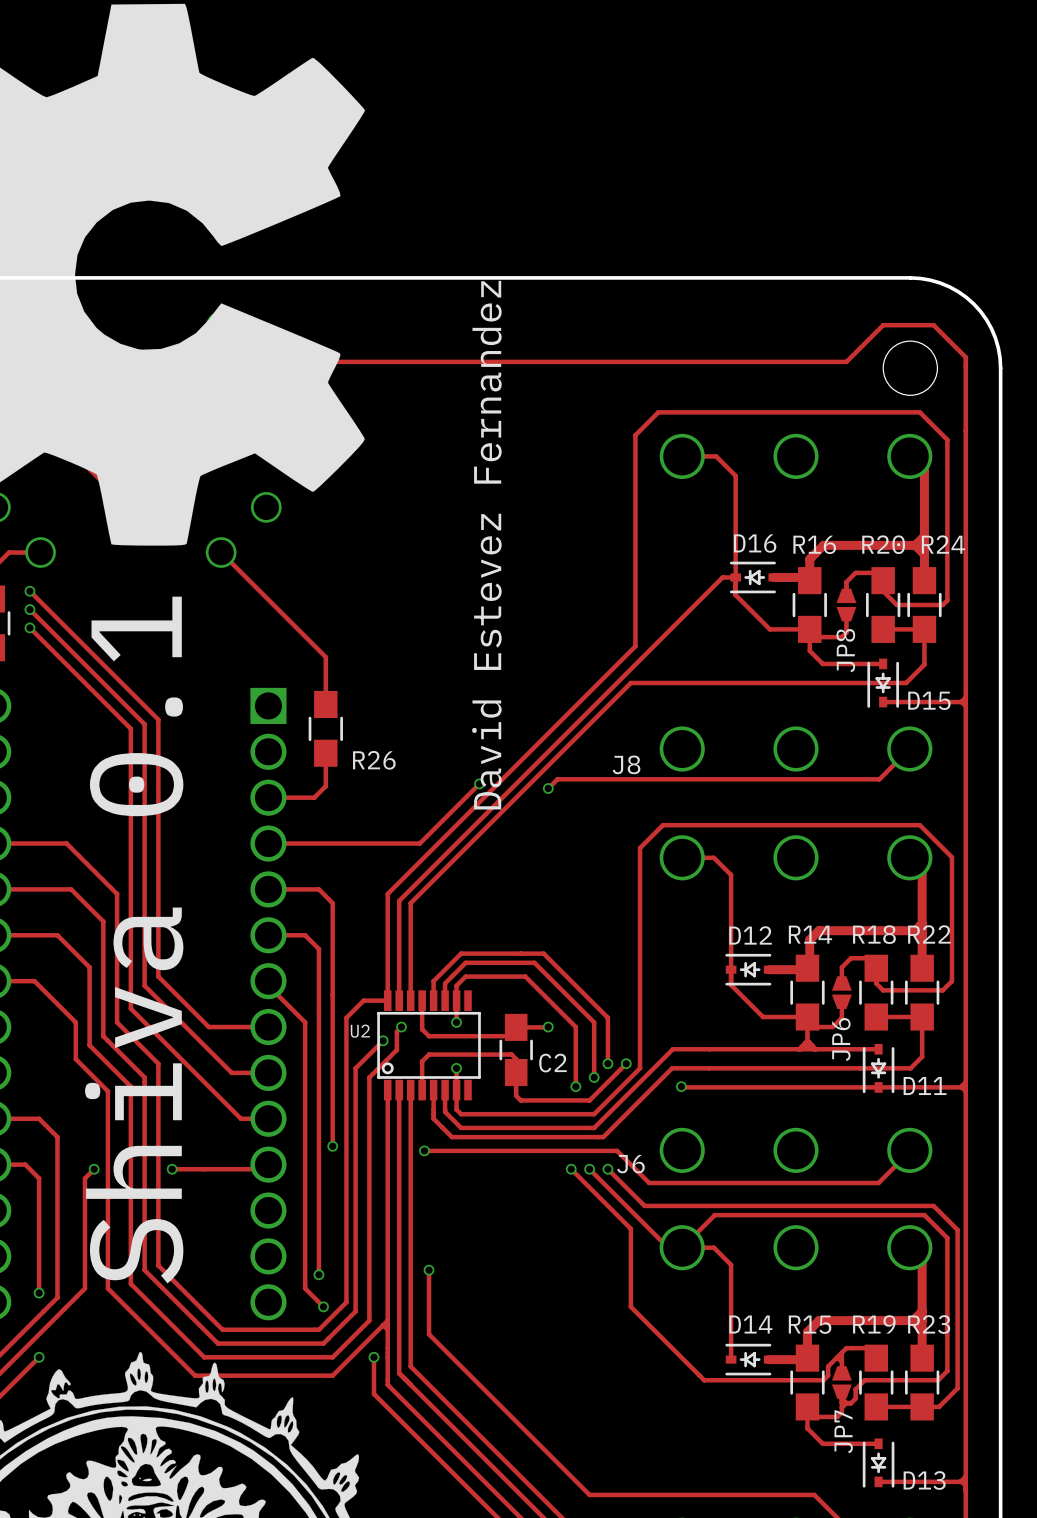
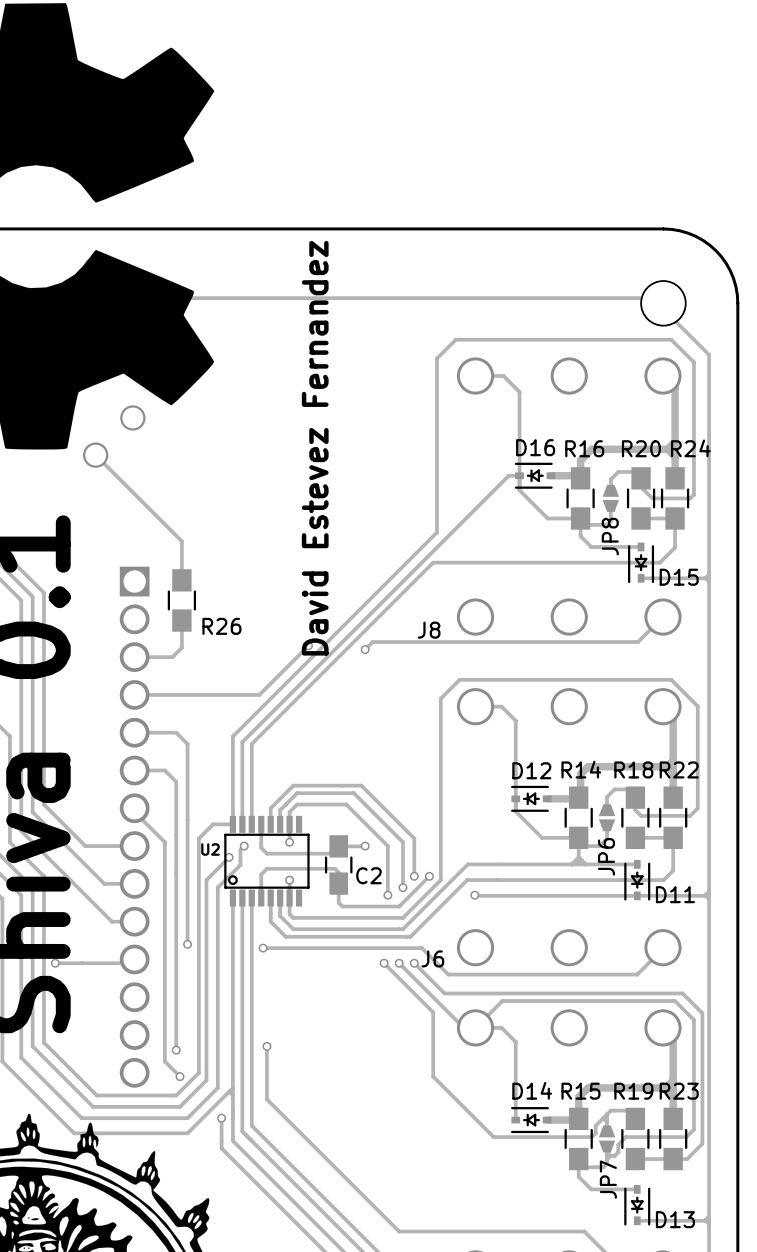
track: (846, 361) (883, 325) (933, 325) (965, 357) (965, 430) -> (610, 298) (652, 298) (709, 354)

